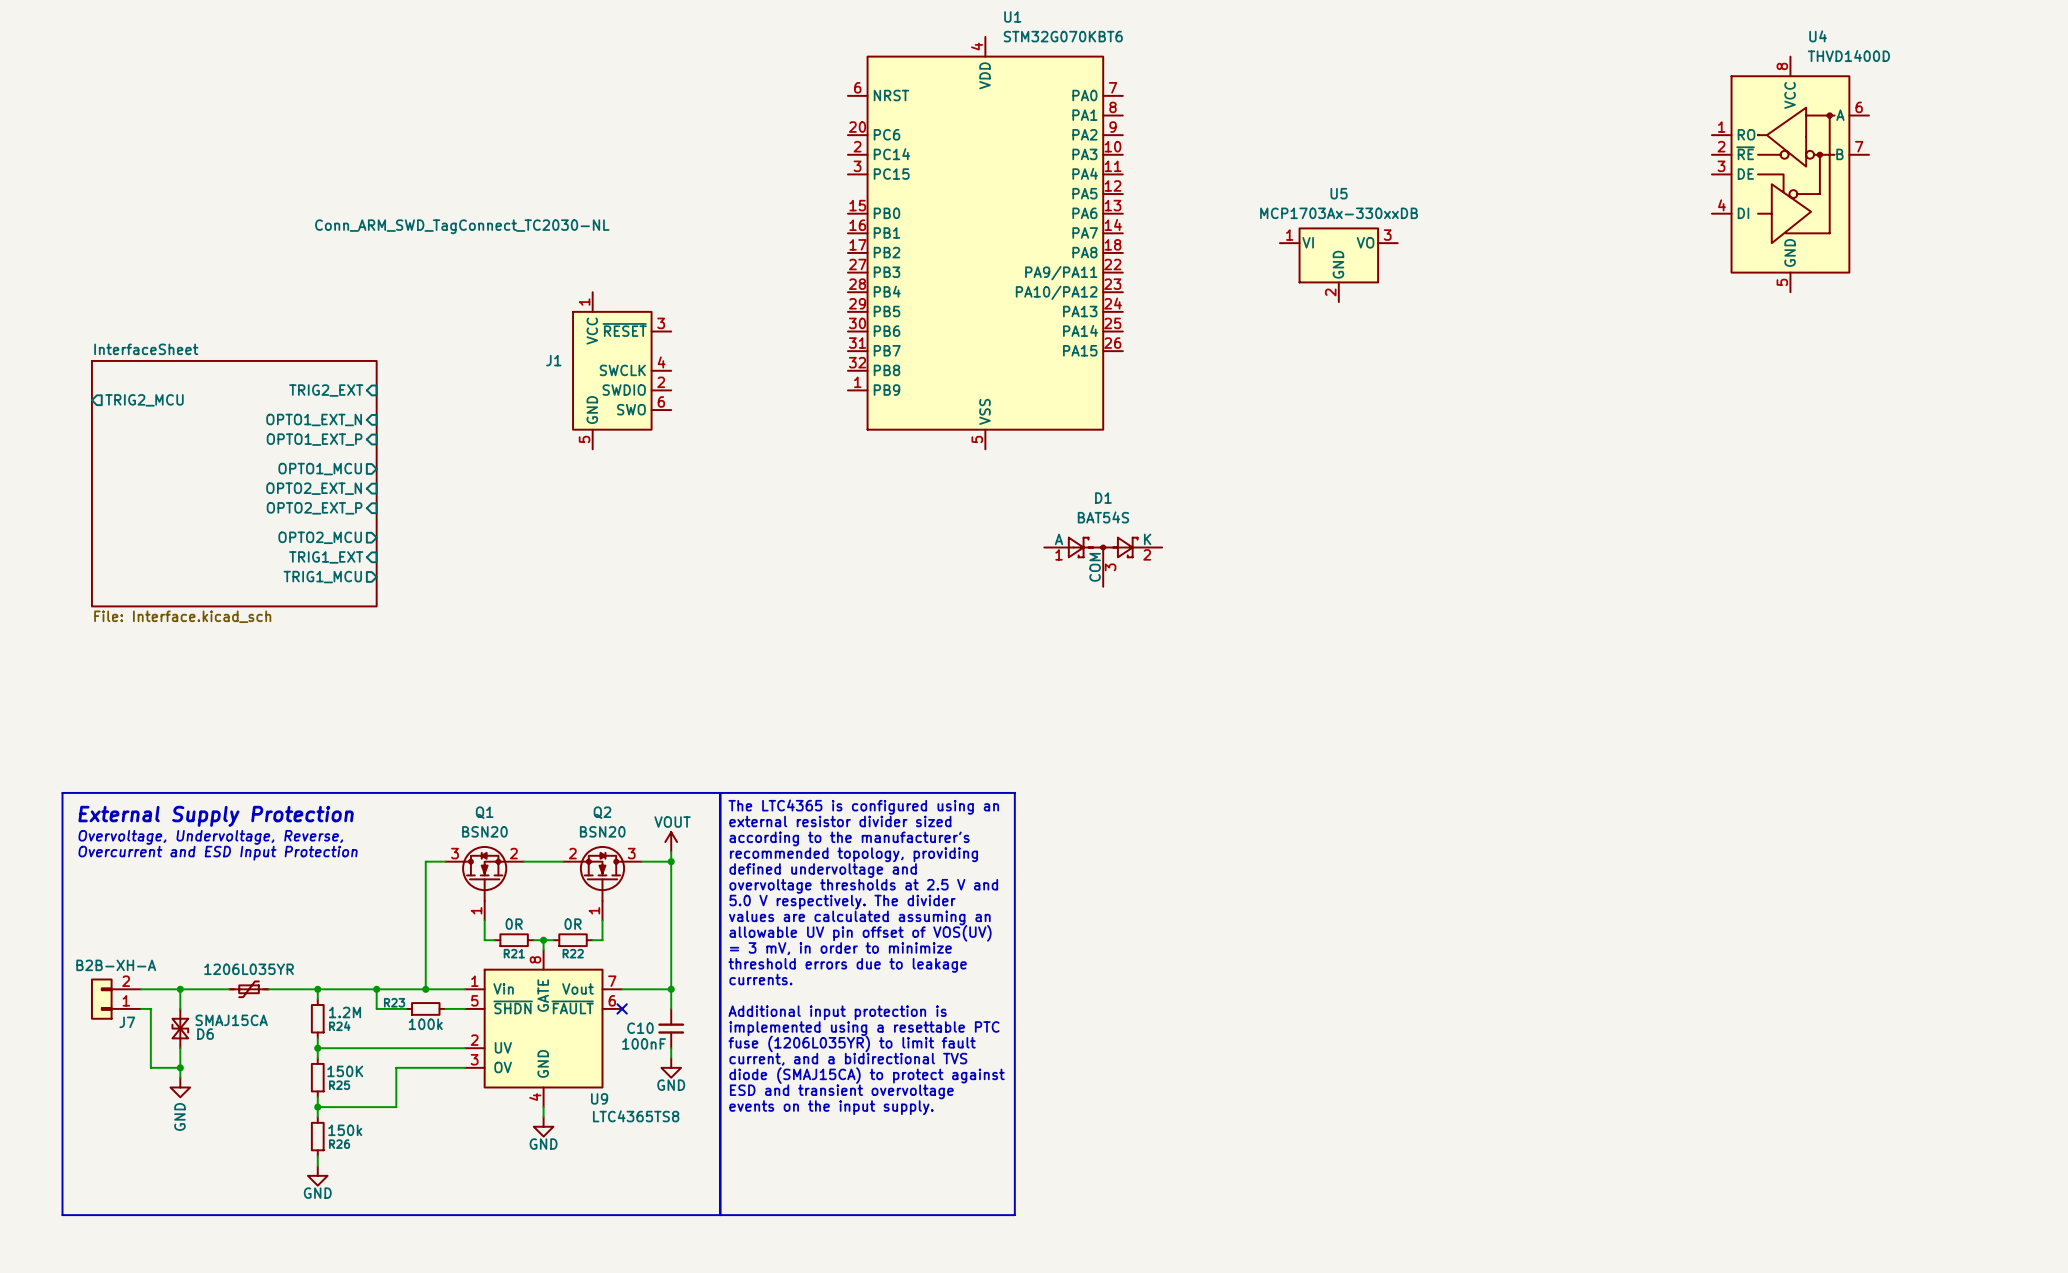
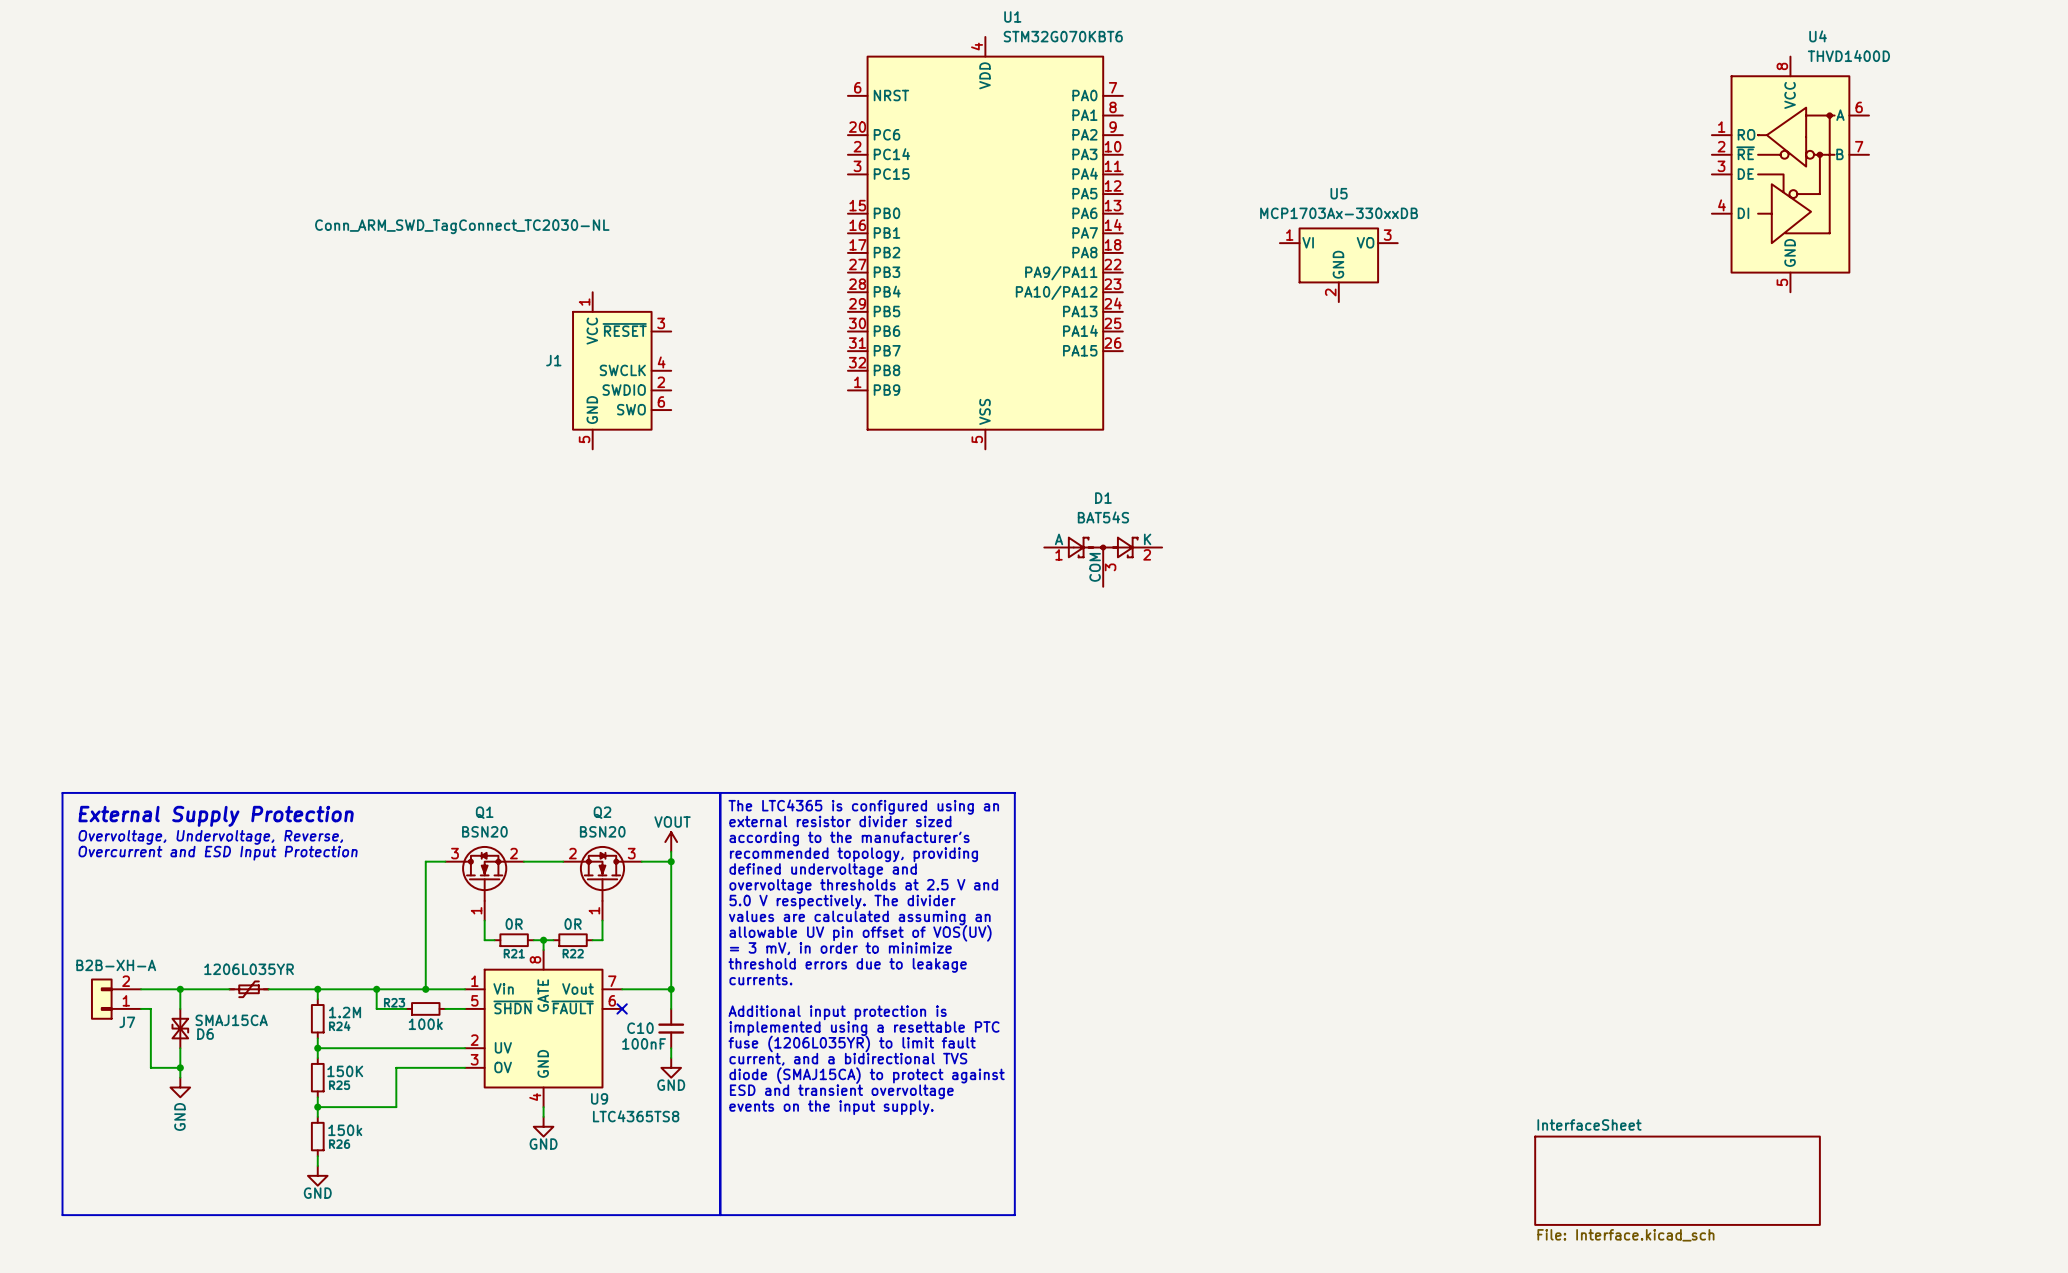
sheet pin: TRIG2_EXT (326, 390) -> none
sheet pin: TRIG2_MCU (144, 400) -> none
sheet pin: OPTO1_EXT_N (314, 419) -> none
sheet pin: OPTO1_EXT_P (314, 439) -> none
sheet pin: OPTO1_MCU (320, 469) -> none
sheet InterfaceSheet: File: Interface.kicad_sch (234, 483) -> none
sheet pin: OPTO2_EXT_N (314, 488) -> none
sheet pin: OPTO2_EXT_P (314, 508) -> none
sheet pin: OPTO2_MCU (320, 537) -> none
sheet pin: TRIG1_EXT (326, 557) -> none
sheet pin: TRIG1_MCU (322, 577) -> none
sheet InterfaceSheet: none -> File: Interface.kicad_sch (1677, 1180)

